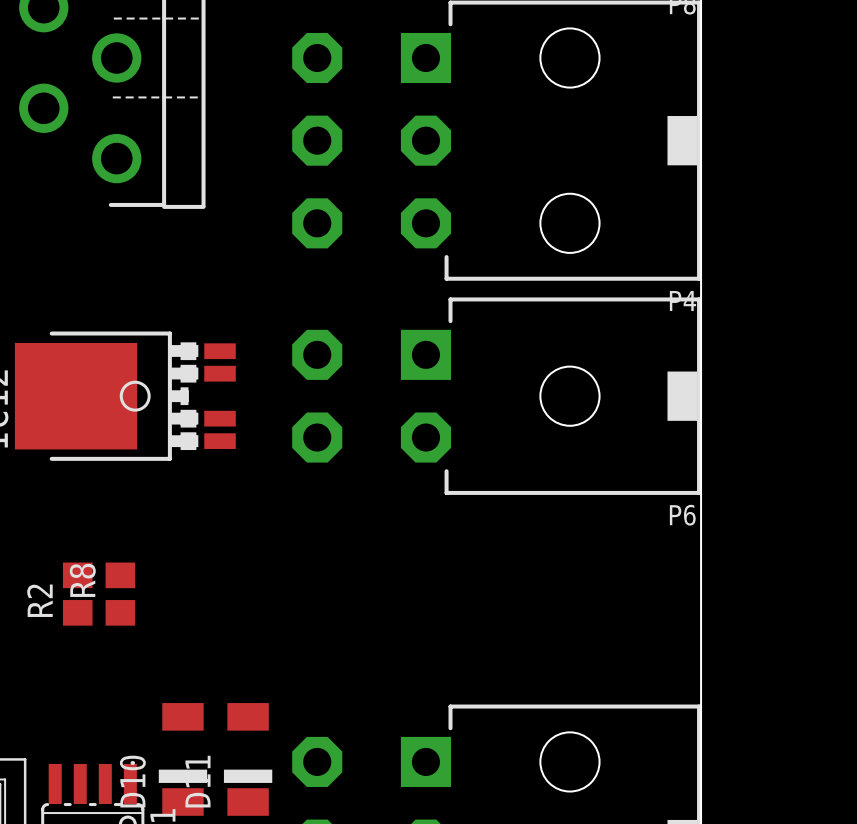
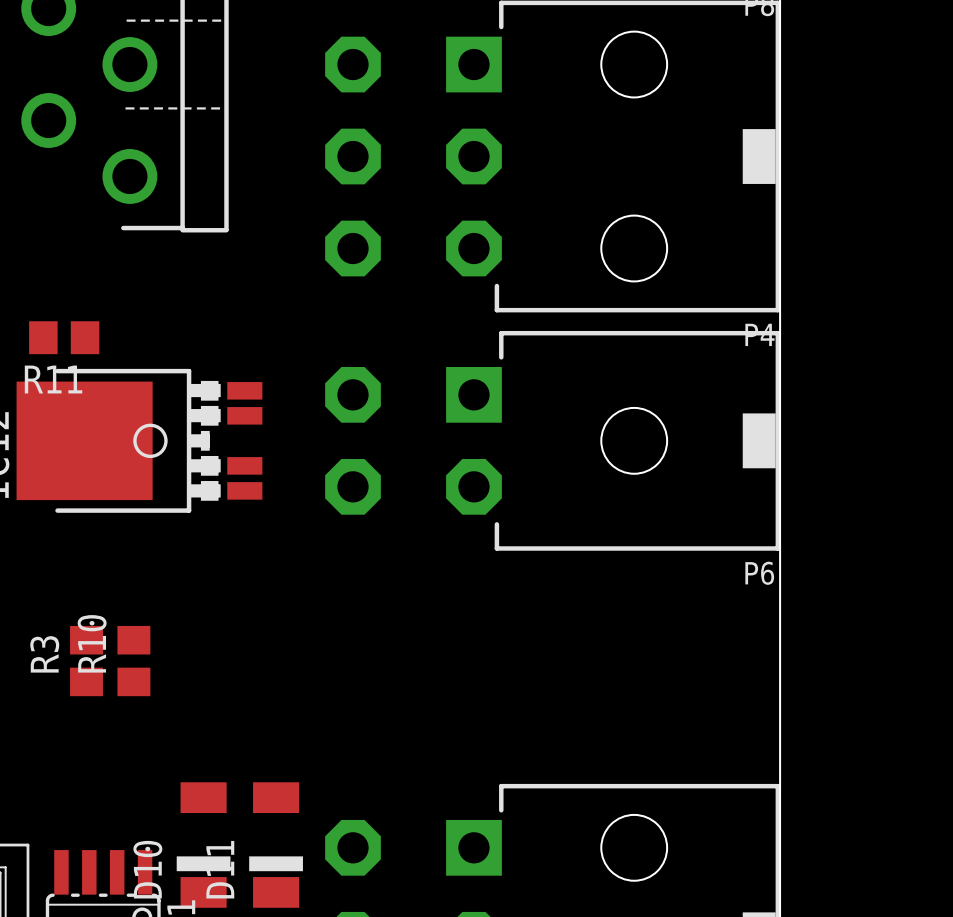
R11: none -> (64, 337)
R8 name: R8 (82, 580) -> R10 (92, 643)
R2 name: R2 (39, 600) -> R3 (44, 654)

